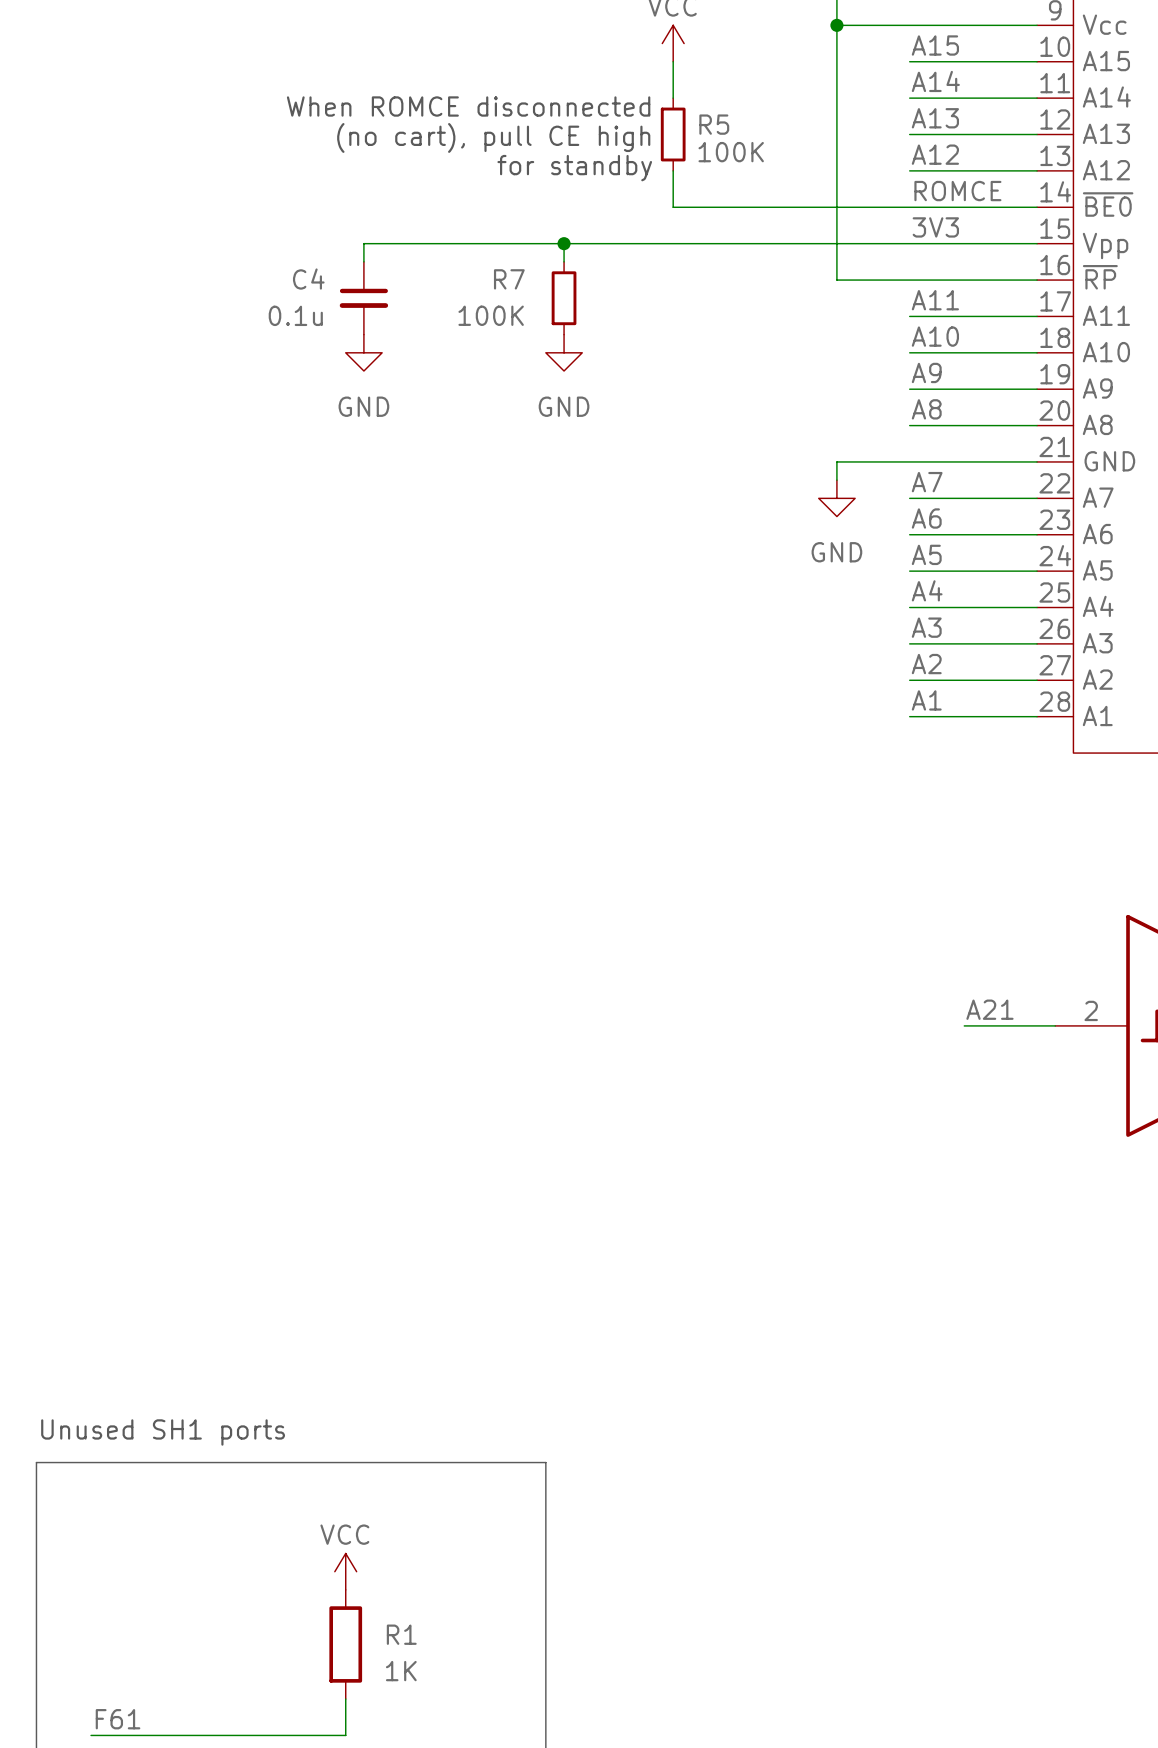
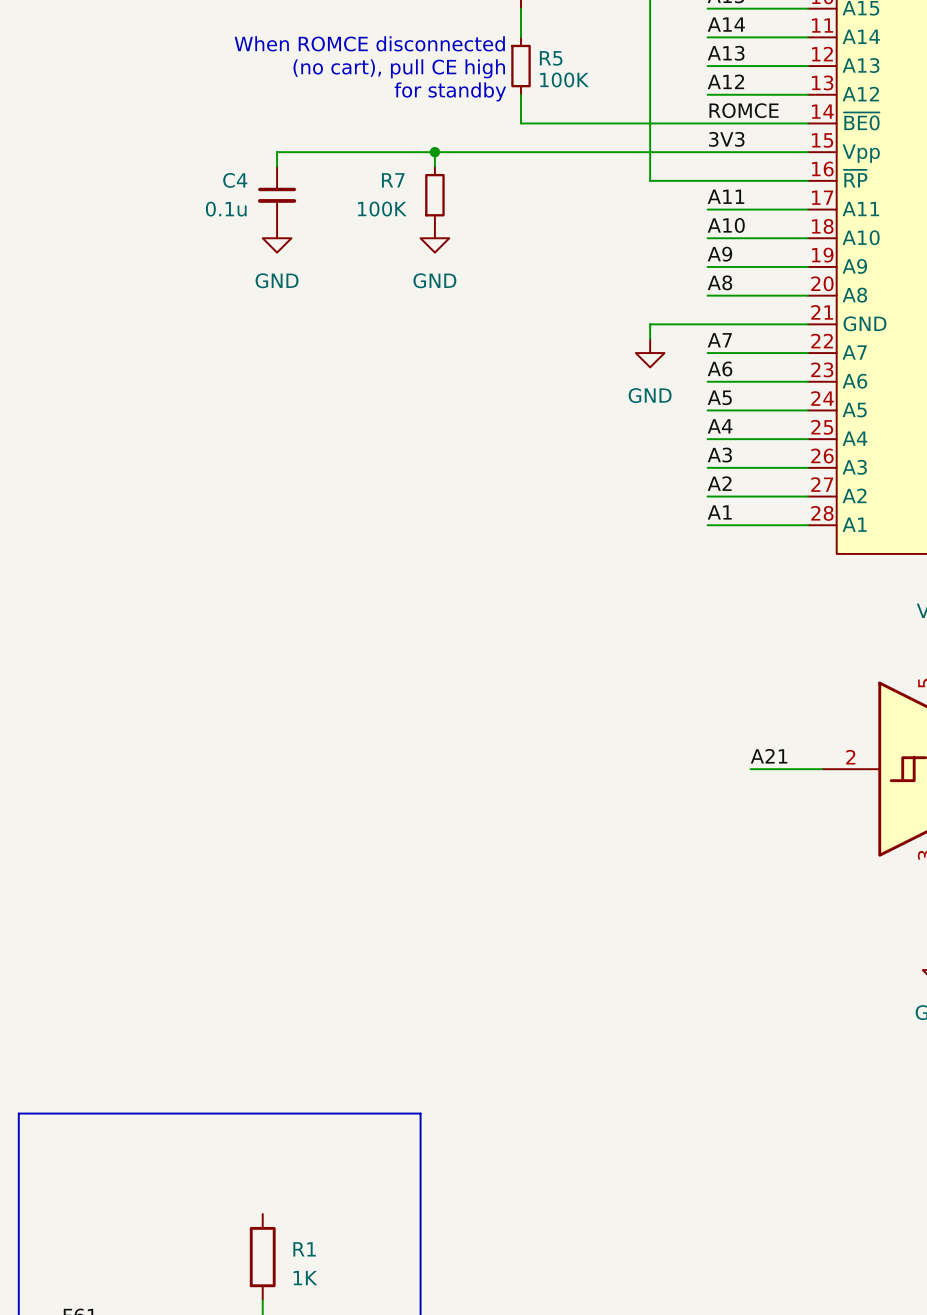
text: Unused SH1 ports (163, 1432) -> none
power symbol: VCC (345, 1571) -> none

